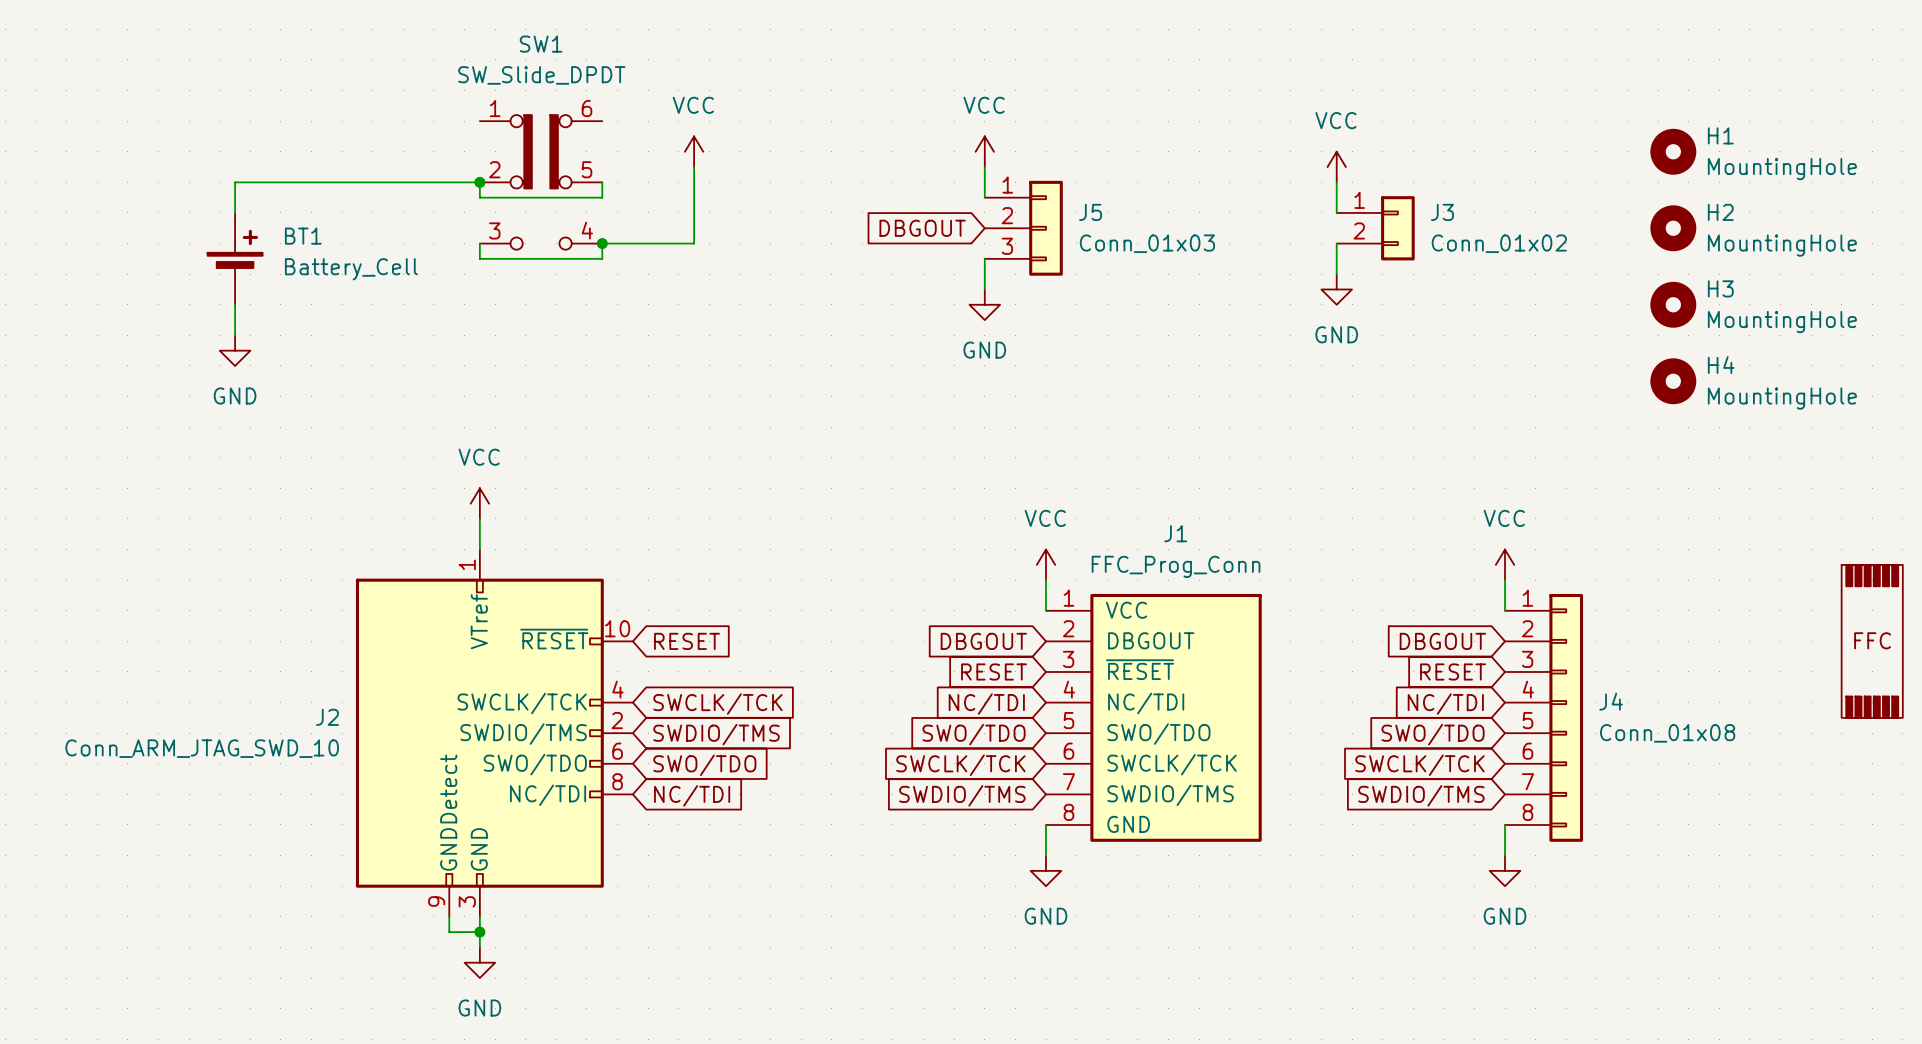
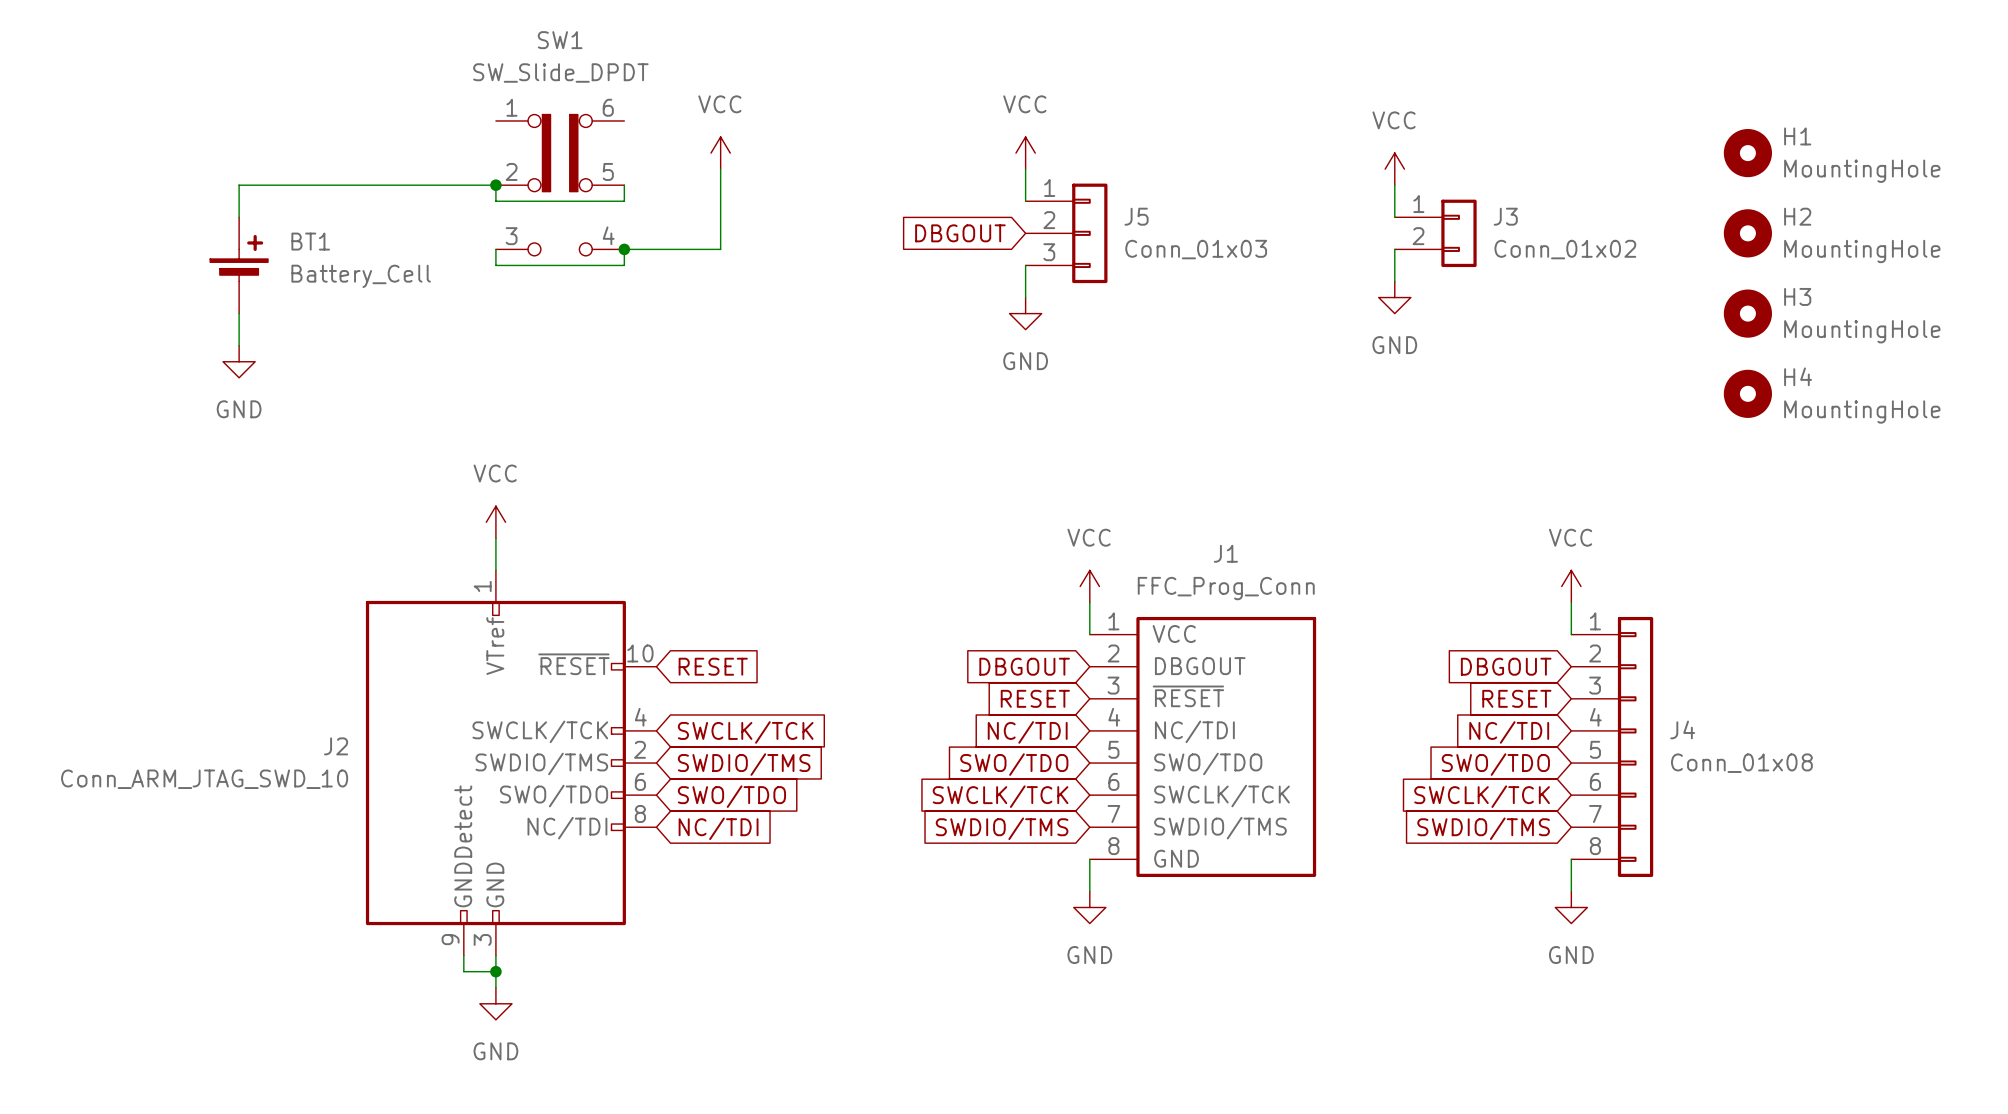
part: (1872, 641) -> none

